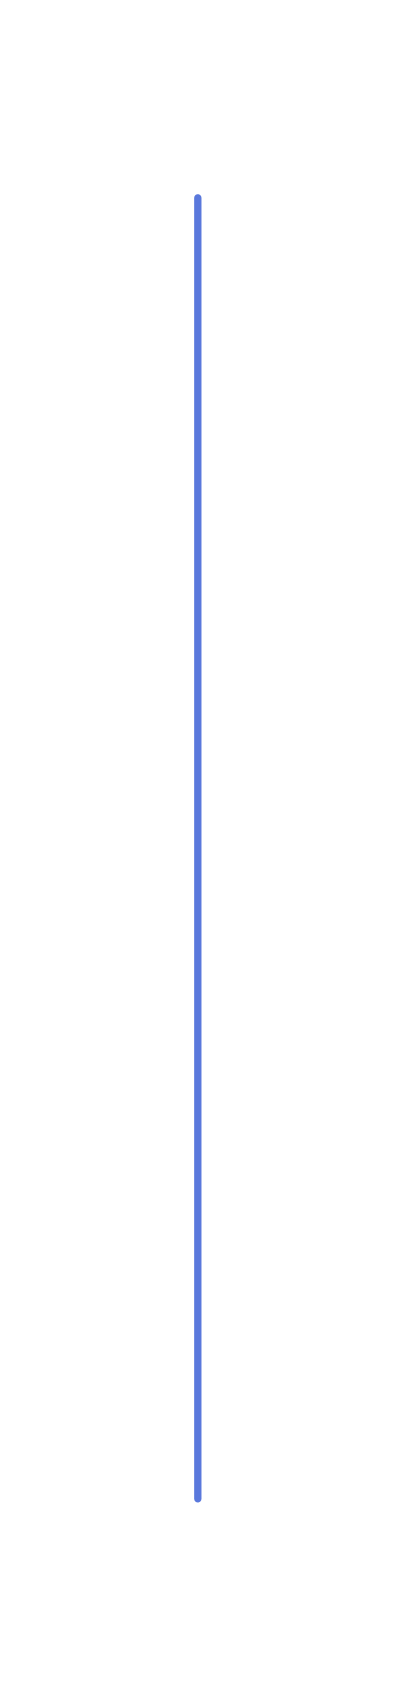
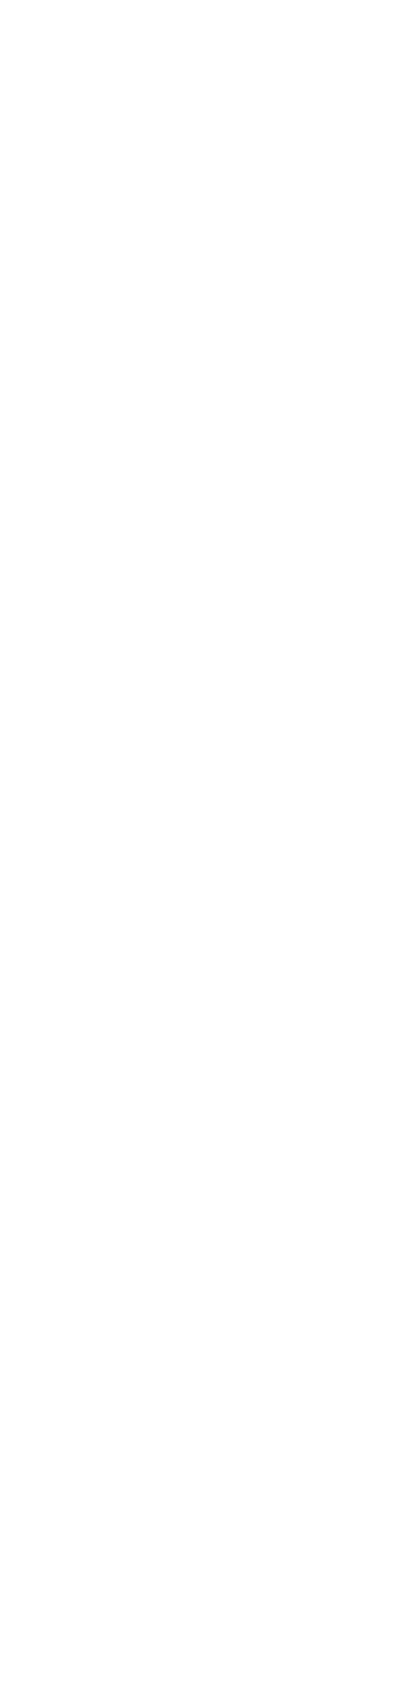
bottom track: (197, 197) (197, 1498) -> none

